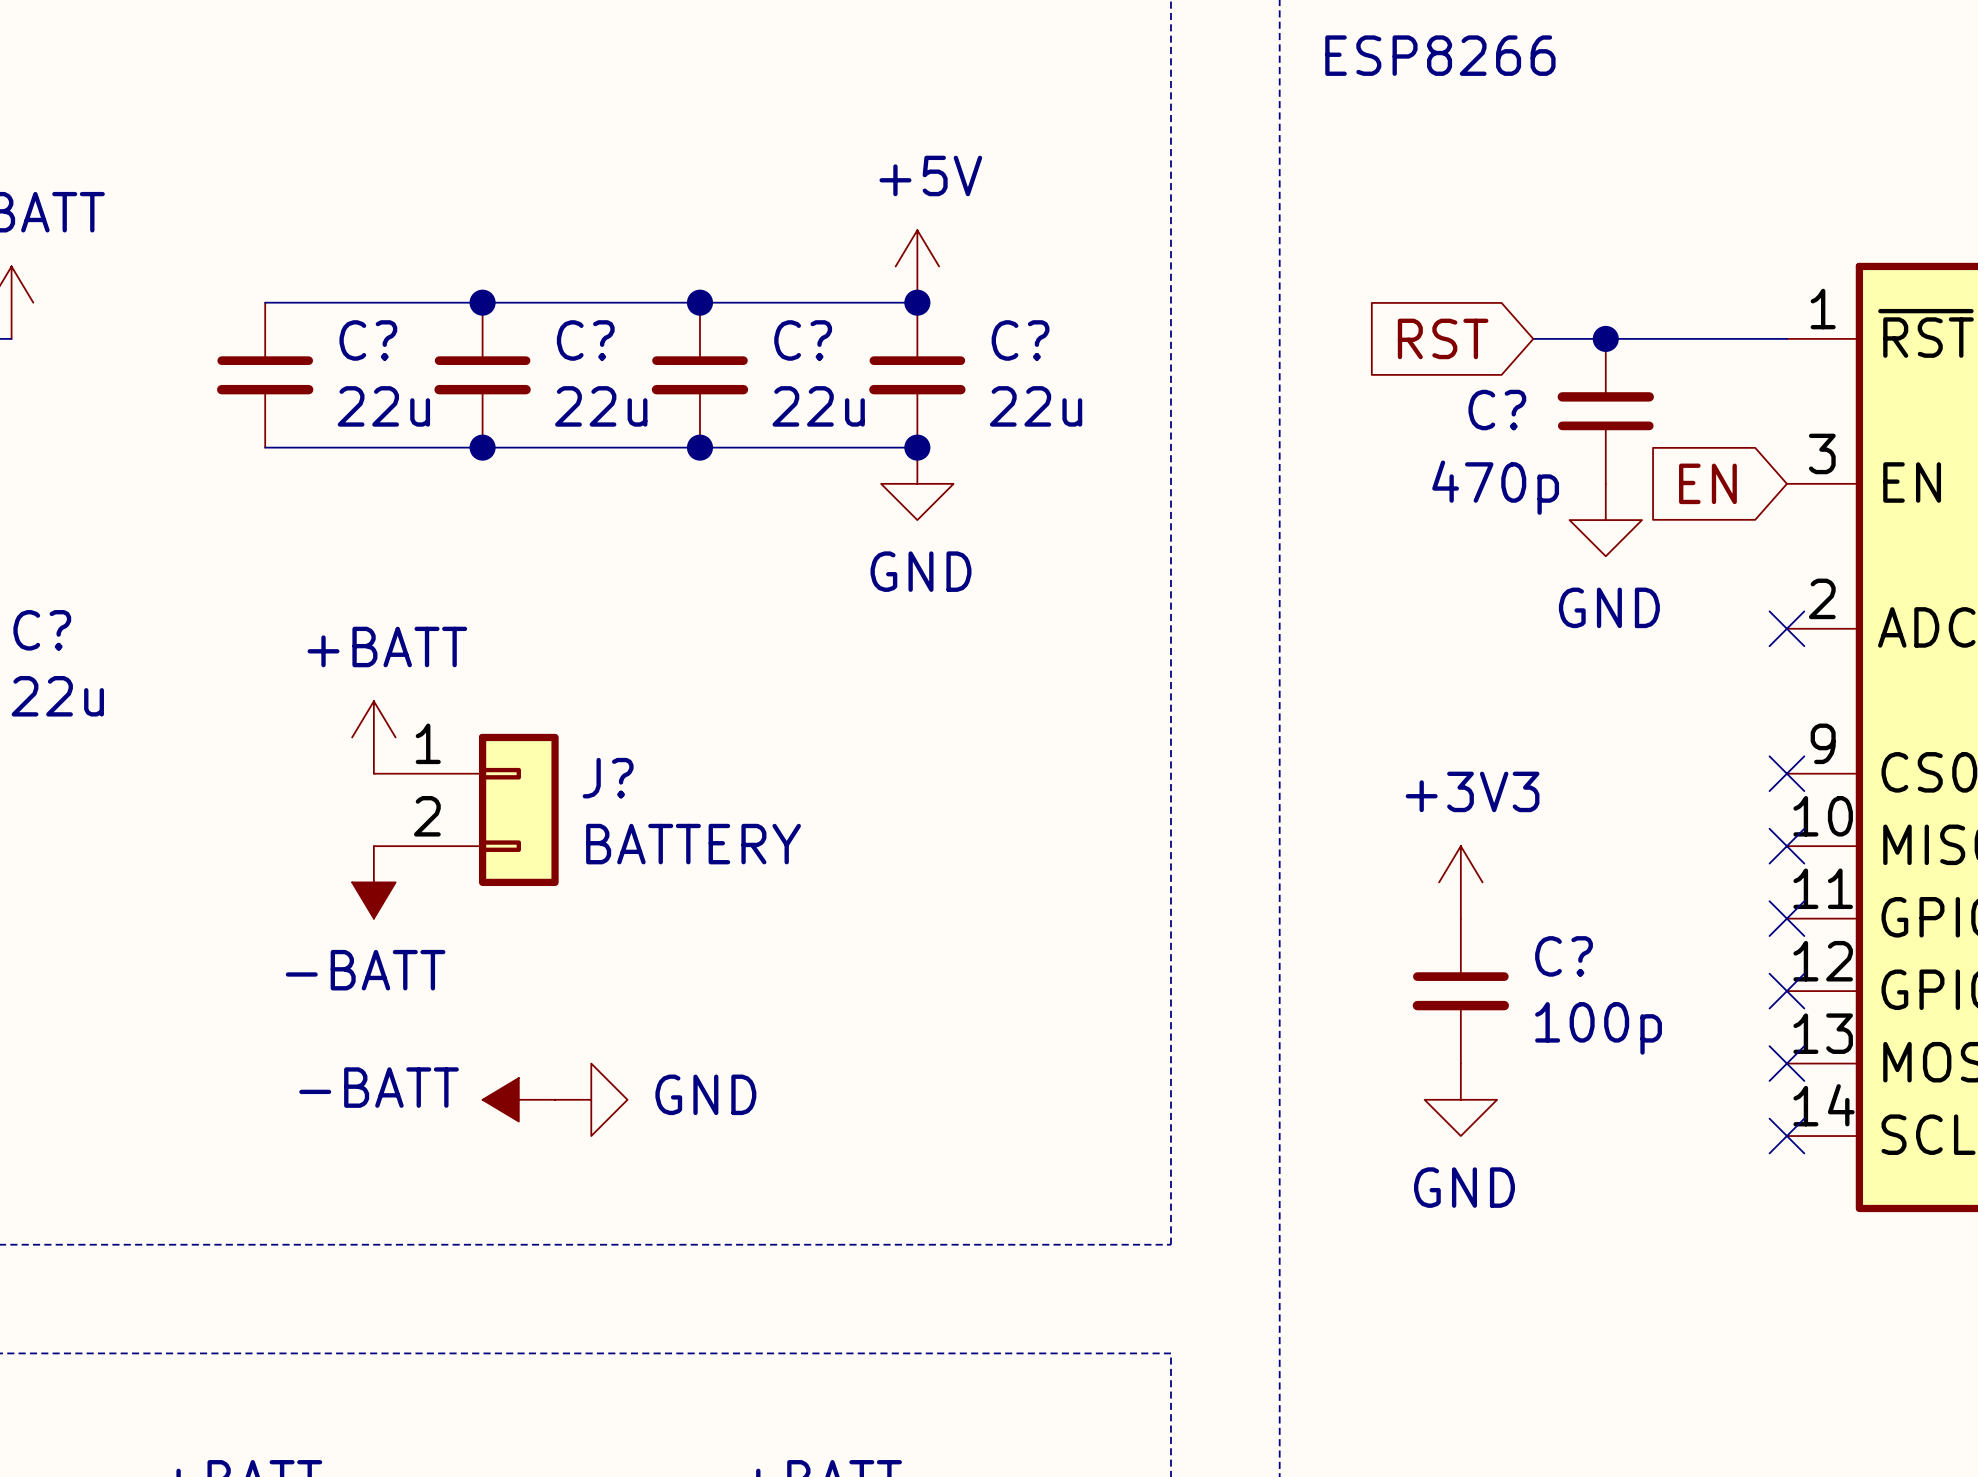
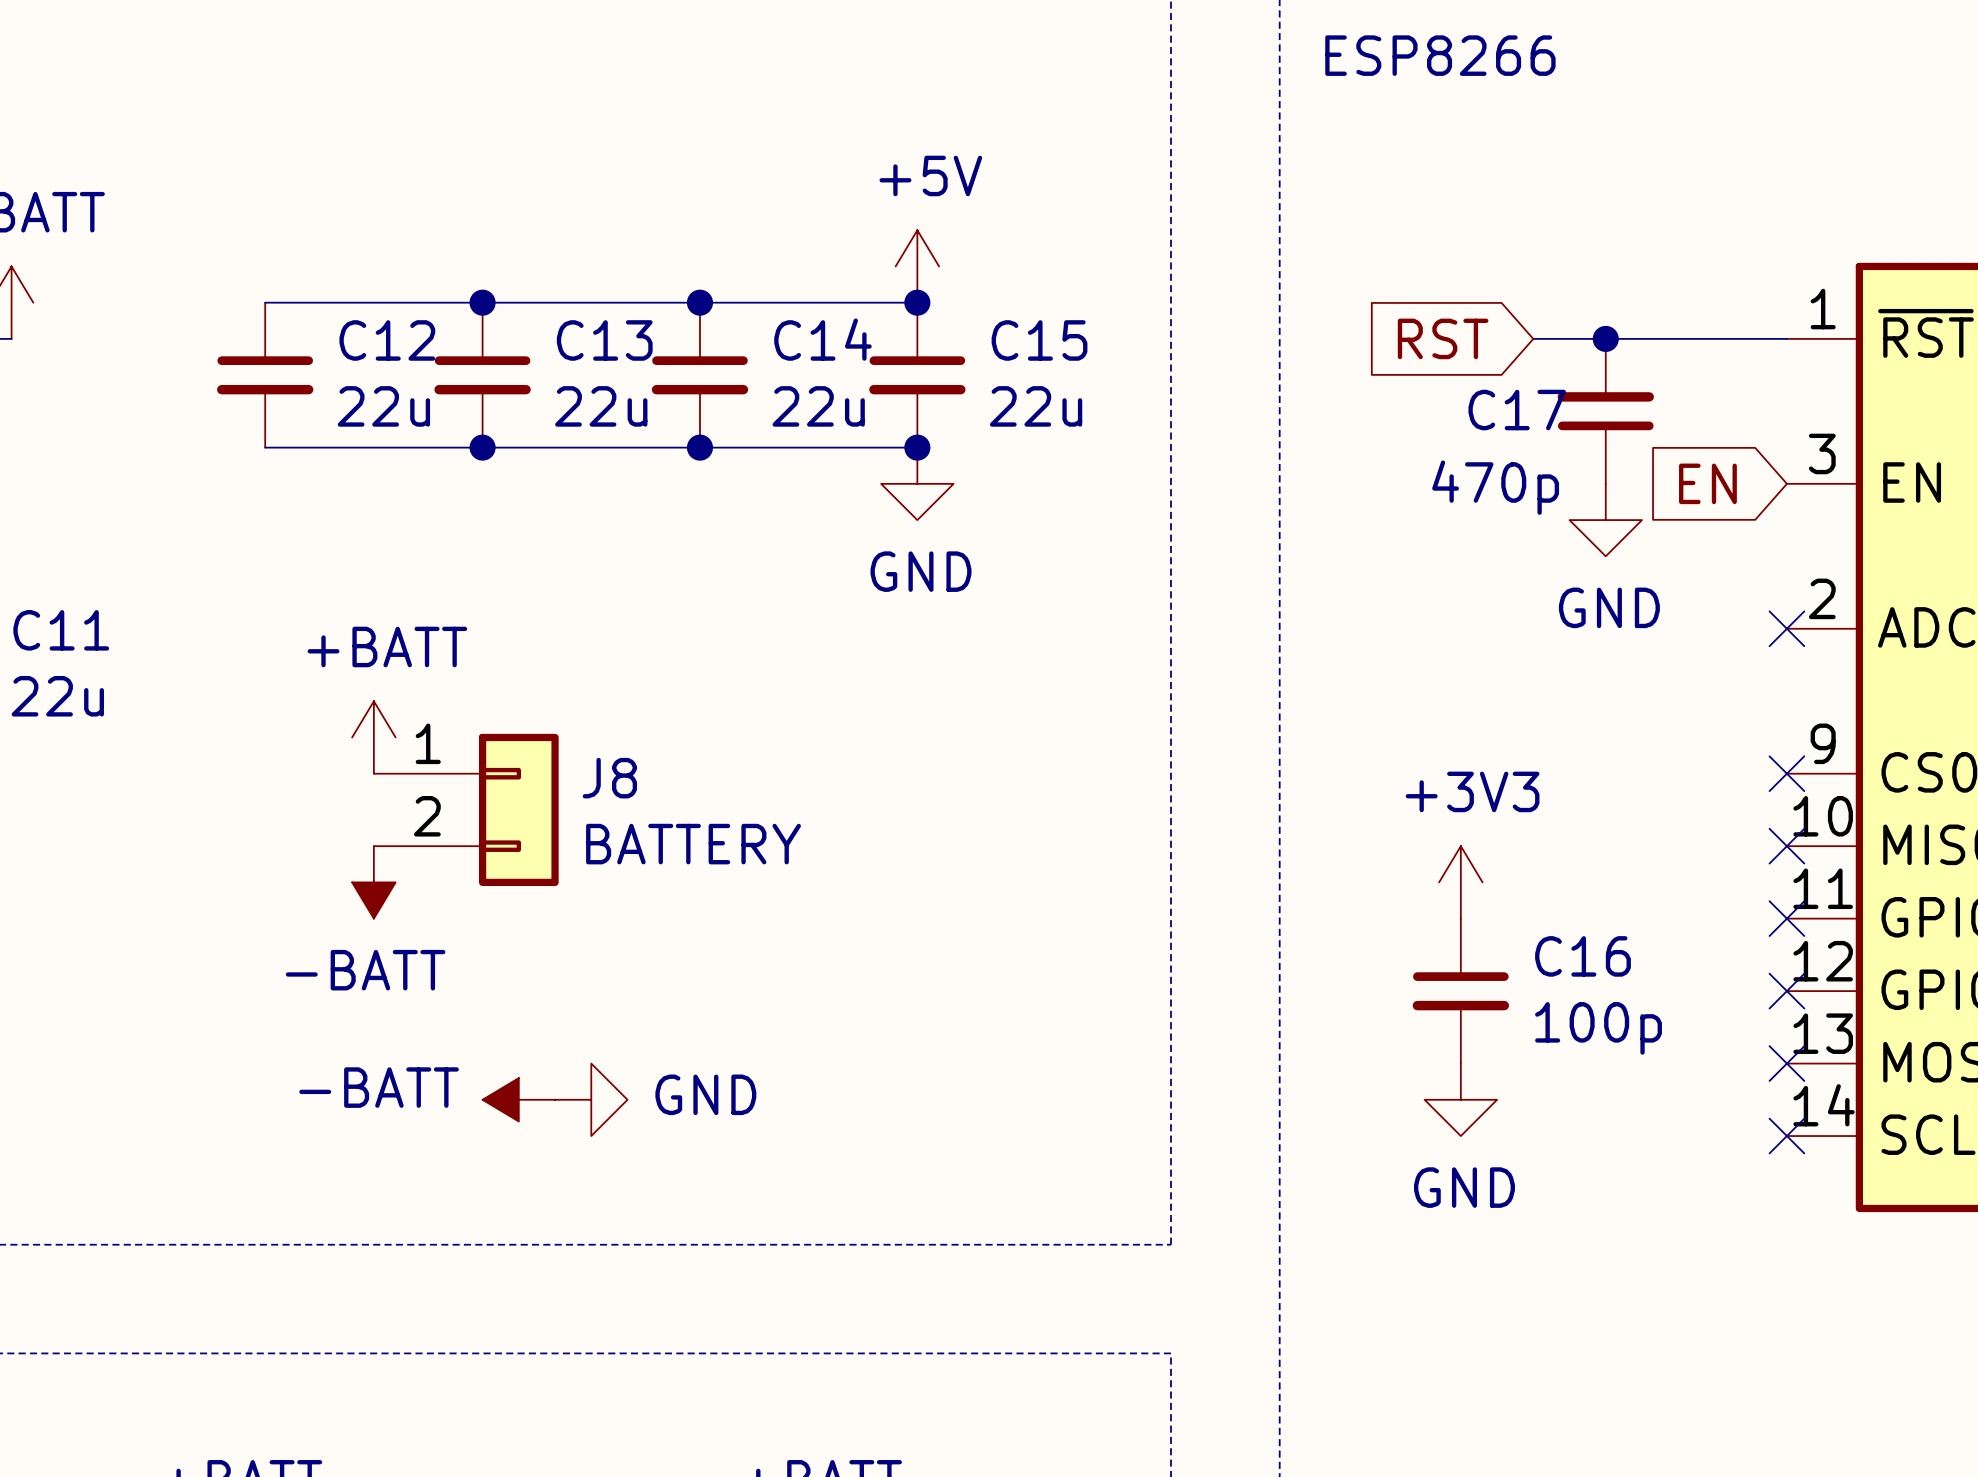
C? name: C? (368, 340) -> C12 (387, 340)
C? name: C? (585, 340) -> C13 (604, 340)
C? name: C? (803, 340) -> C14 (822, 339)
C? name: C? (1020, 340) -> C15 (1039, 340)
C? name: C? (1497, 410) -> C17 (1517, 410)
C? name: C? (42, 630) -> C11 (61, 630)
J? name: J? (608, 778) -> J8 (609, 778)
C? name: C? (1564, 956) -> C16 (1583, 956)

